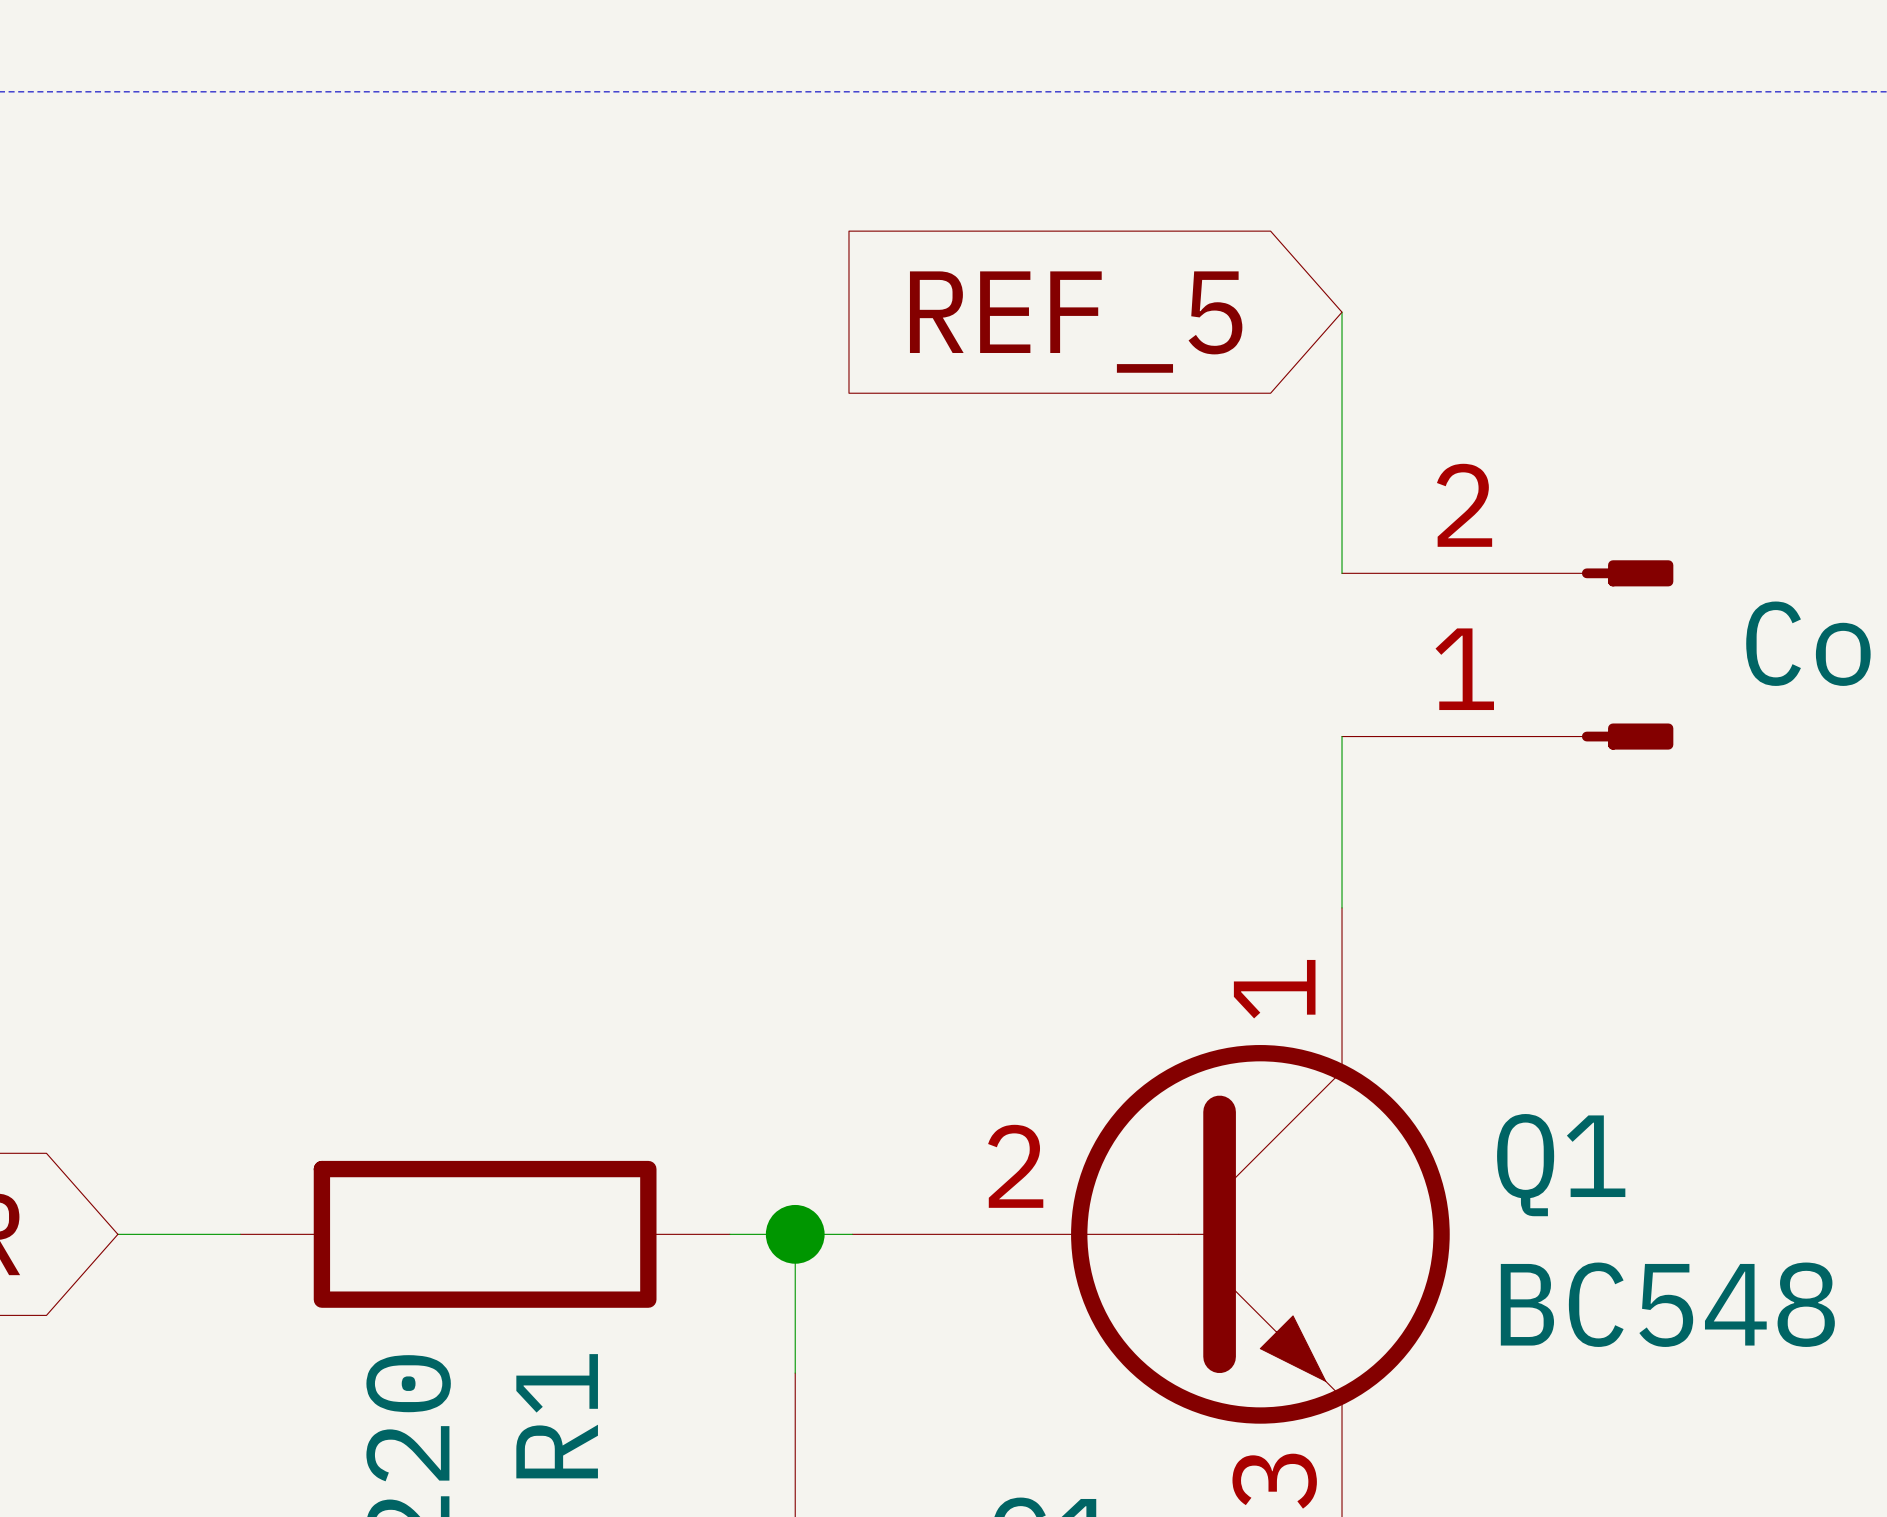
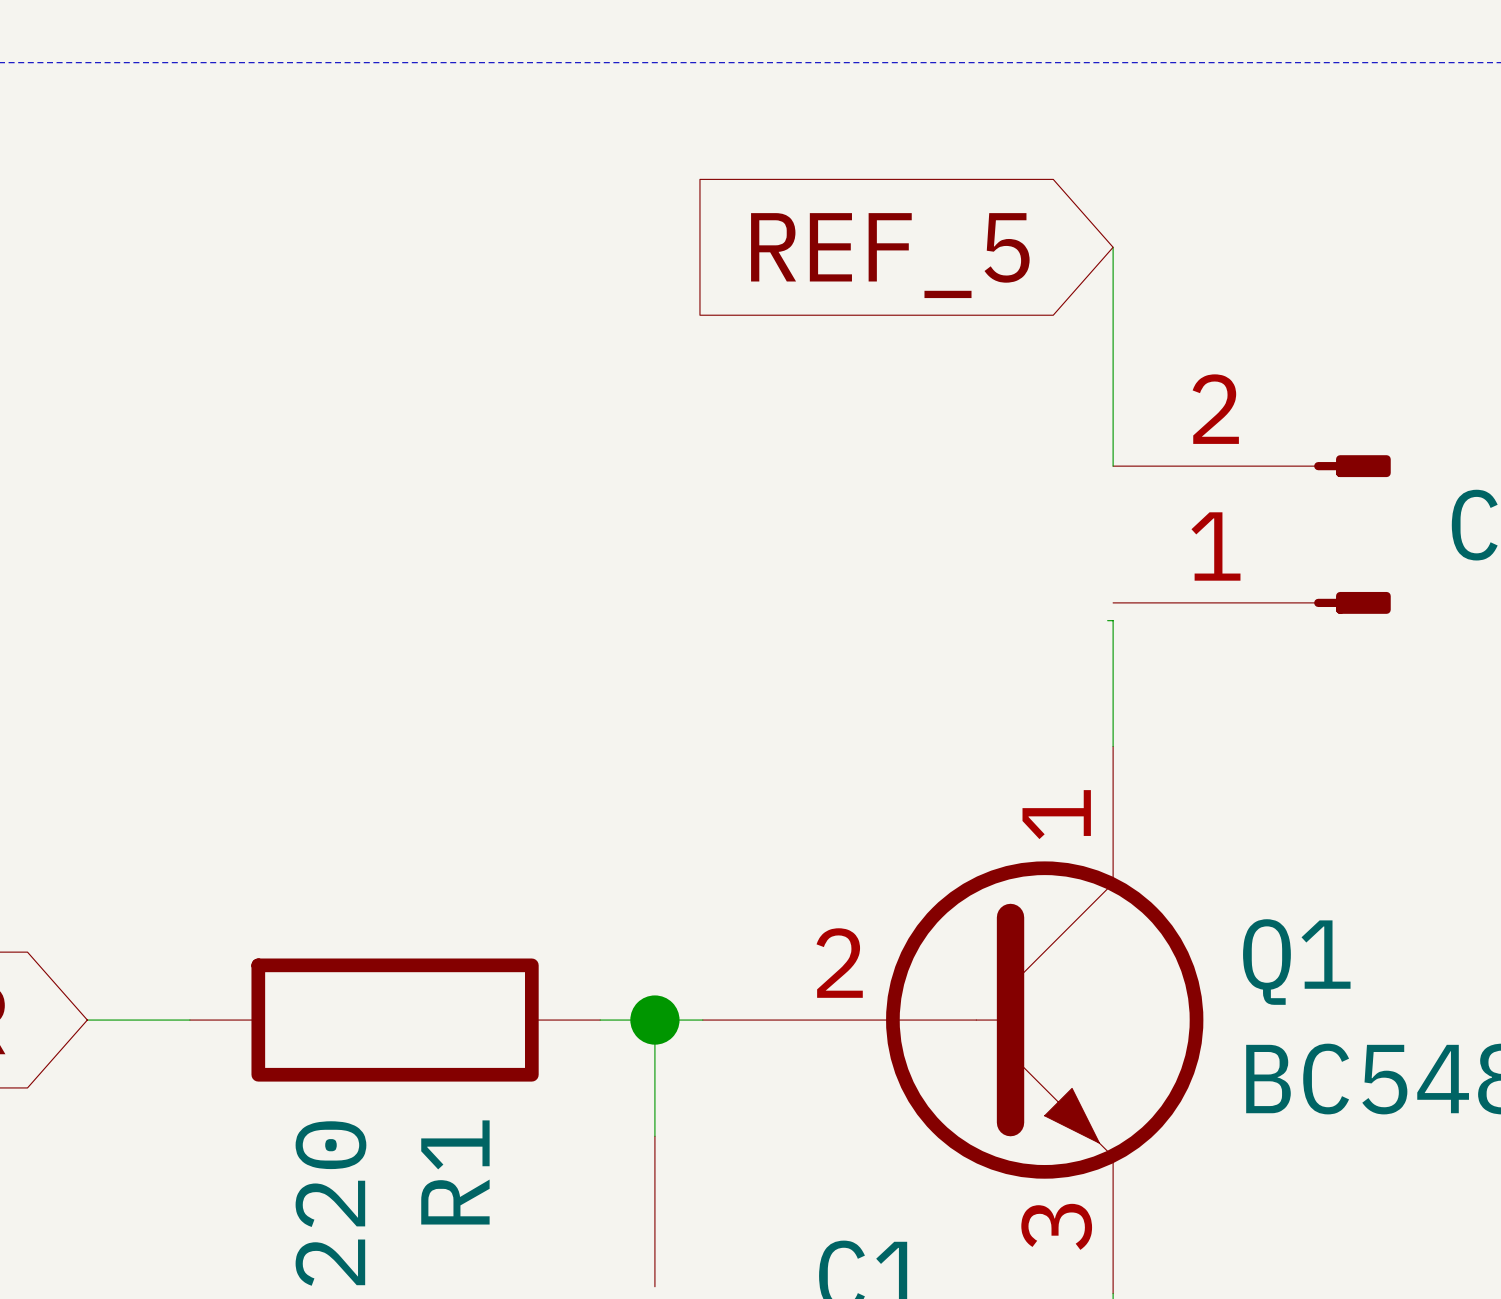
wire: (1342, 736) (1342, 757) -> (1107, 620) (1113, 620)

